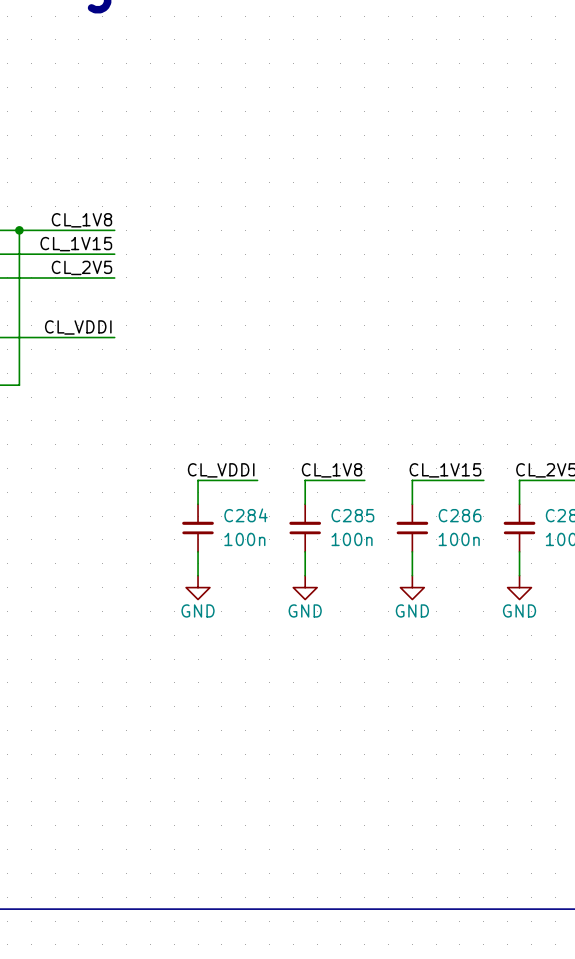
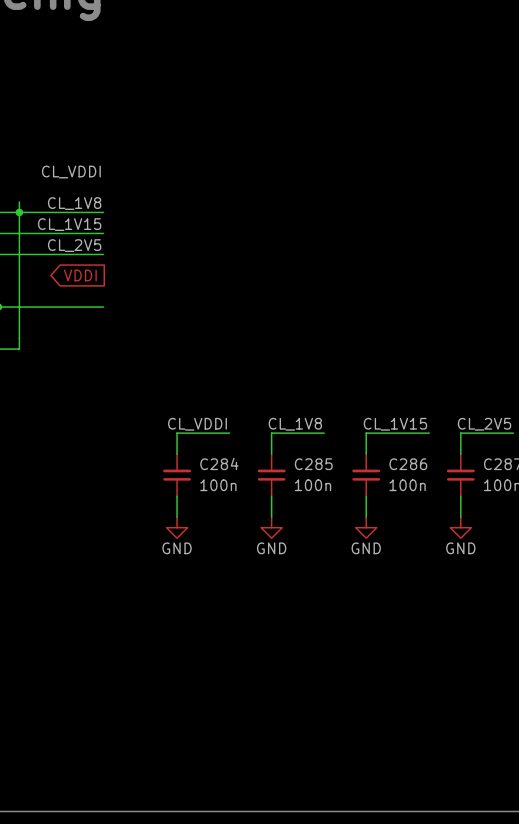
wire: none -> (19, 201) (19, 212)
global label: none -> VDDI (80, 275)
label position: CL_VDDI (78, 327) -> CL_VDDI (71, 172)

